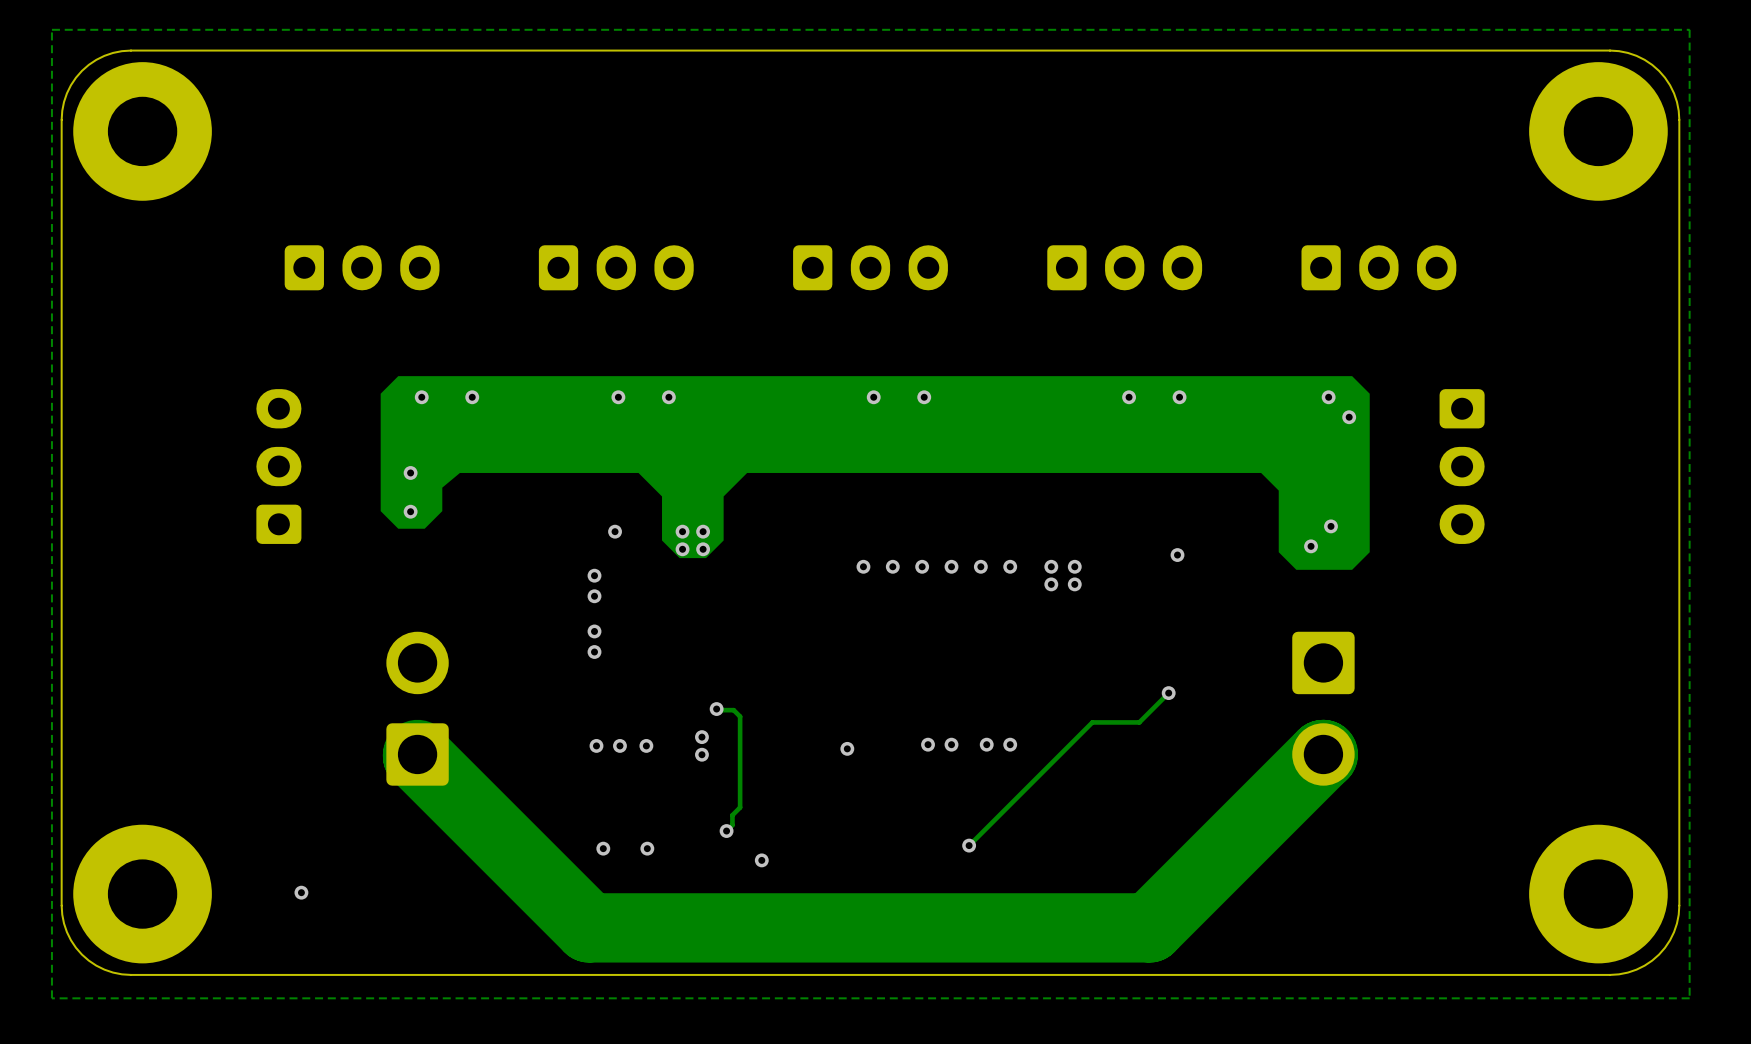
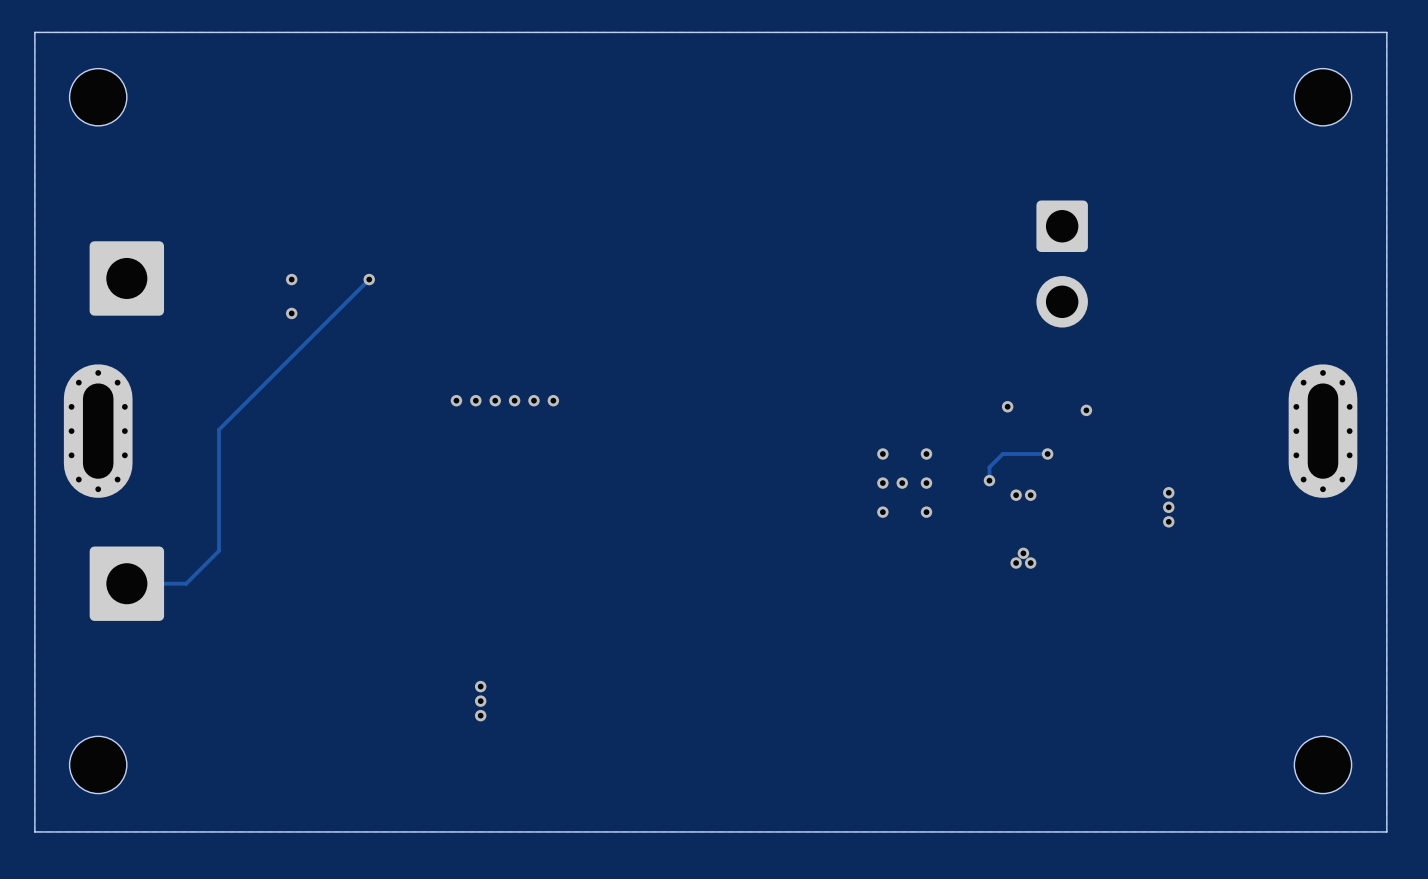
board edge: (1610, 50) (131, 50) (113, 52) (96, 59) (81, 70) (70, 85) (64, 101) (61, 119) (61, 905) (64, 923) (70, 940) (81, 954) (96, 965) (113, 972) (131, 974) (1610, 974) (1627, 972) (1644, 965) (1659, 954) (1670, 940) (1676, 923) (1679, 905) (1679, 119) (1674, 93) (1659, 70) (1636, 55) (1610, 50) -> (1386, 32) (1386, 831) (34, 831) (34, 32) (1386, 32)
part: none -> (98, 97)
part: none -> (1322, 97)
part: (142, 131) -> none
part: (1598, 131) -> none
part: (362, 267) -> none
part: (616, 267) -> none
part: (870, 267) -> none
part: (1124, 267) -> none
part: (1378, 267) -> none
part: none -> (126, 278)
via: none -> (291, 279)
track: none -> (369, 279) (219, 429) (219, 550) (186, 583) (126, 583)
via: none -> (369, 279)
via: none -> (291, 313)
drawing: [380, 376, 1370, 570] -> none
via: (421, 397) -> none
via: (472, 397) -> none
via: (618, 397) -> none
via: (668, 397) -> none
via: (873, 397) -> none
via: (924, 397) -> none
via: (1129, 397) -> none
via: (1179, 397) -> none
via: (1328, 397) -> none
via: (1349, 417) -> none
part: (278, 466) -> none
part: (1462, 466) -> none
via: (410, 472) -> none
via: none -> (456, 400)
via: none -> (475, 400)
via: none -> (495, 400)
via: none -> (514, 400)
via: none -> (533, 400)
via: none -> (553, 400)
via: none -> (1007, 406)
via: none -> (1086, 410)
via: (410, 511) -> none
part: none -> (98, 431)
part: none -> (1322, 431)
via: (1330, 526) -> none
via: (615, 531) -> none
via: (682, 531) -> none
via: (703, 531) -> none
via: none -> (882, 453)
via: none -> (926, 453)
track: none -> (1047, 453) (1002, 453) (989, 467) (989, 480)
via: none -> (1047, 453)
via: (1311, 546) -> none
via: (682, 549) -> none
via: (703, 549) -> none
via: (1177, 555) -> none
via: (863, 566) -> none
via: (892, 566) -> none
via: (922, 566) -> none
via: (951, 566) -> none
via: (980, 566) -> none
via: (1010, 566) -> none
via: (1051, 566) -> none
via: (1074, 566) -> none
via: none -> (989, 480)
via: (594, 575) -> none
via: none -> (882, 483)
via: none -> (902, 483)
via: none -> (926, 483)
via: (1051, 584) -> none
via: (1074, 584) -> none
via: none -> (1168, 492)
via: none -> (1016, 495)
via: none -> (1030, 495)
via: (594, 596) -> none
via: none -> (1168, 507)
via: none -> (882, 512)
via: none -> (926, 512)
via: none -> (1168, 521)
via: (594, 631) -> none
via: (594, 652) -> none
via: none -> (1023, 553)
via: none -> (1016, 563)
via: none -> (1030, 563)
track: (1168, 693) (1139, 722) (1092, 722) (969, 845) -> none
via: (1168, 693) -> none
part: none -> (126, 583)
part: (417, 708) -> none
part position: (1323, 708) -> (1062, 264)
track: (716, 709) (733, 710) (740, 716) (740, 807) (732, 815) (732, 825) (726, 831) -> none
via: (716, 709) -> none
via: (701, 737) -> none
via: (928, 744) -> none
via: (951, 744) -> none
via: (986, 744) -> none
via: (1010, 744) -> none
via: (596, 745) -> none
via: (619, 745) -> none
via: (646, 745) -> none
via: (847, 748) -> none
via: (701, 754) -> none
track: (1323, 754) (1149, 927) (589, 927) (417, 754) -> none
via: none -> (480, 686)
via: (726, 831) -> none
via: none -> (480, 701)
via: (969, 845) -> none
via: (603, 848) -> none
via: (647, 848) -> none
via: none -> (480, 715)
via: (761, 860) -> none
via: (301, 892) -> none
part: (142, 894) -> none
part: (1598, 894) -> none
part: none -> (98, 764)
part: none -> (1322, 764)

